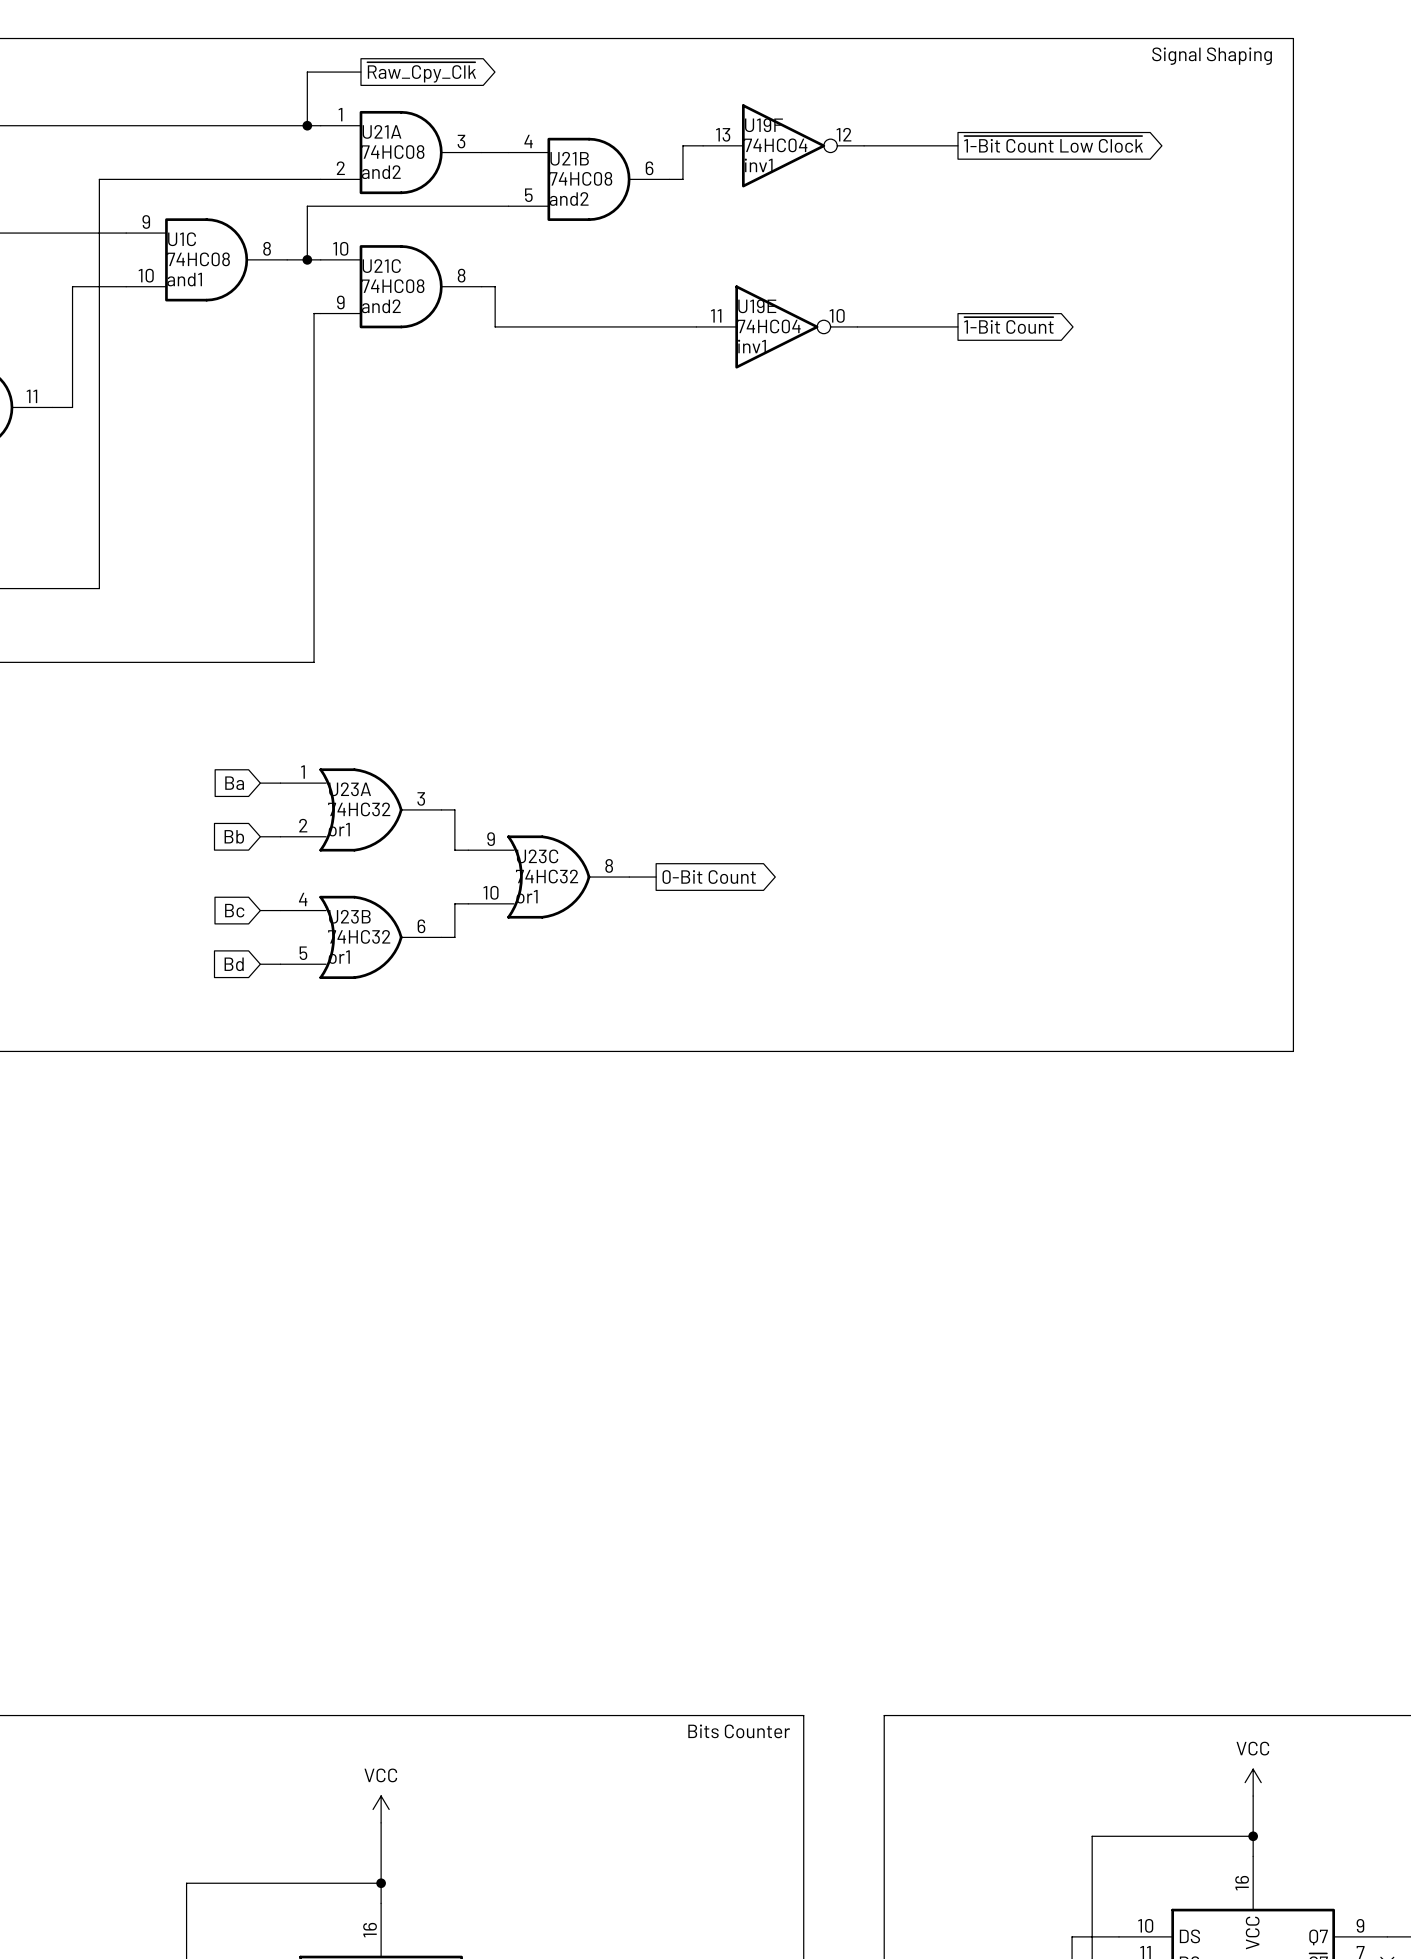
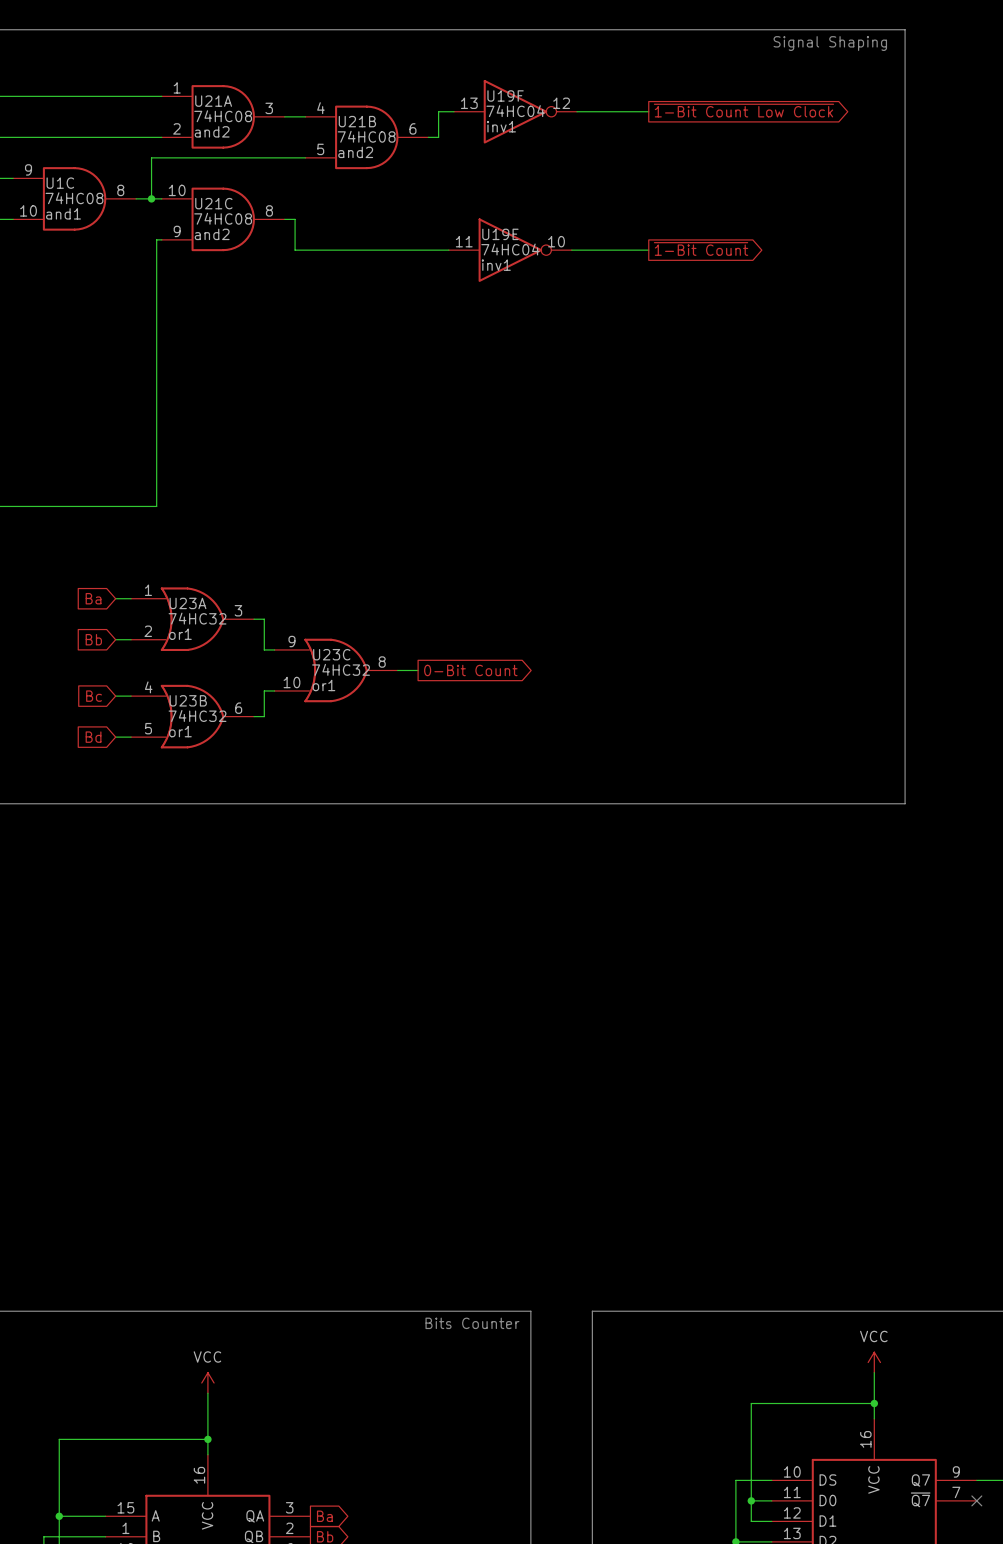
wire: (360, 72) (307, 72) (307, 125) -> none
global label: ~{Raw_Cpy_Clk} (421, 72) -> none
junction: (307, 125) -> none

